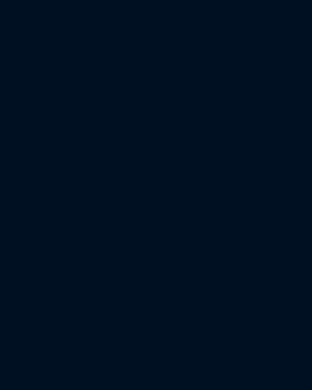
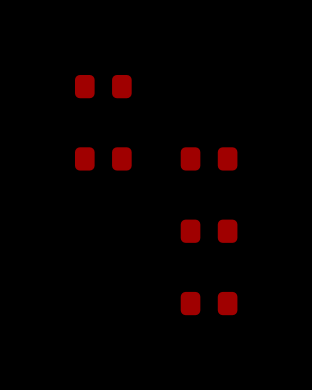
part: none -> (103, 86)
part: none -> (103, 158)
part: none -> (209, 158)
part: none -> (209, 231)
part: none -> (209, 303)

